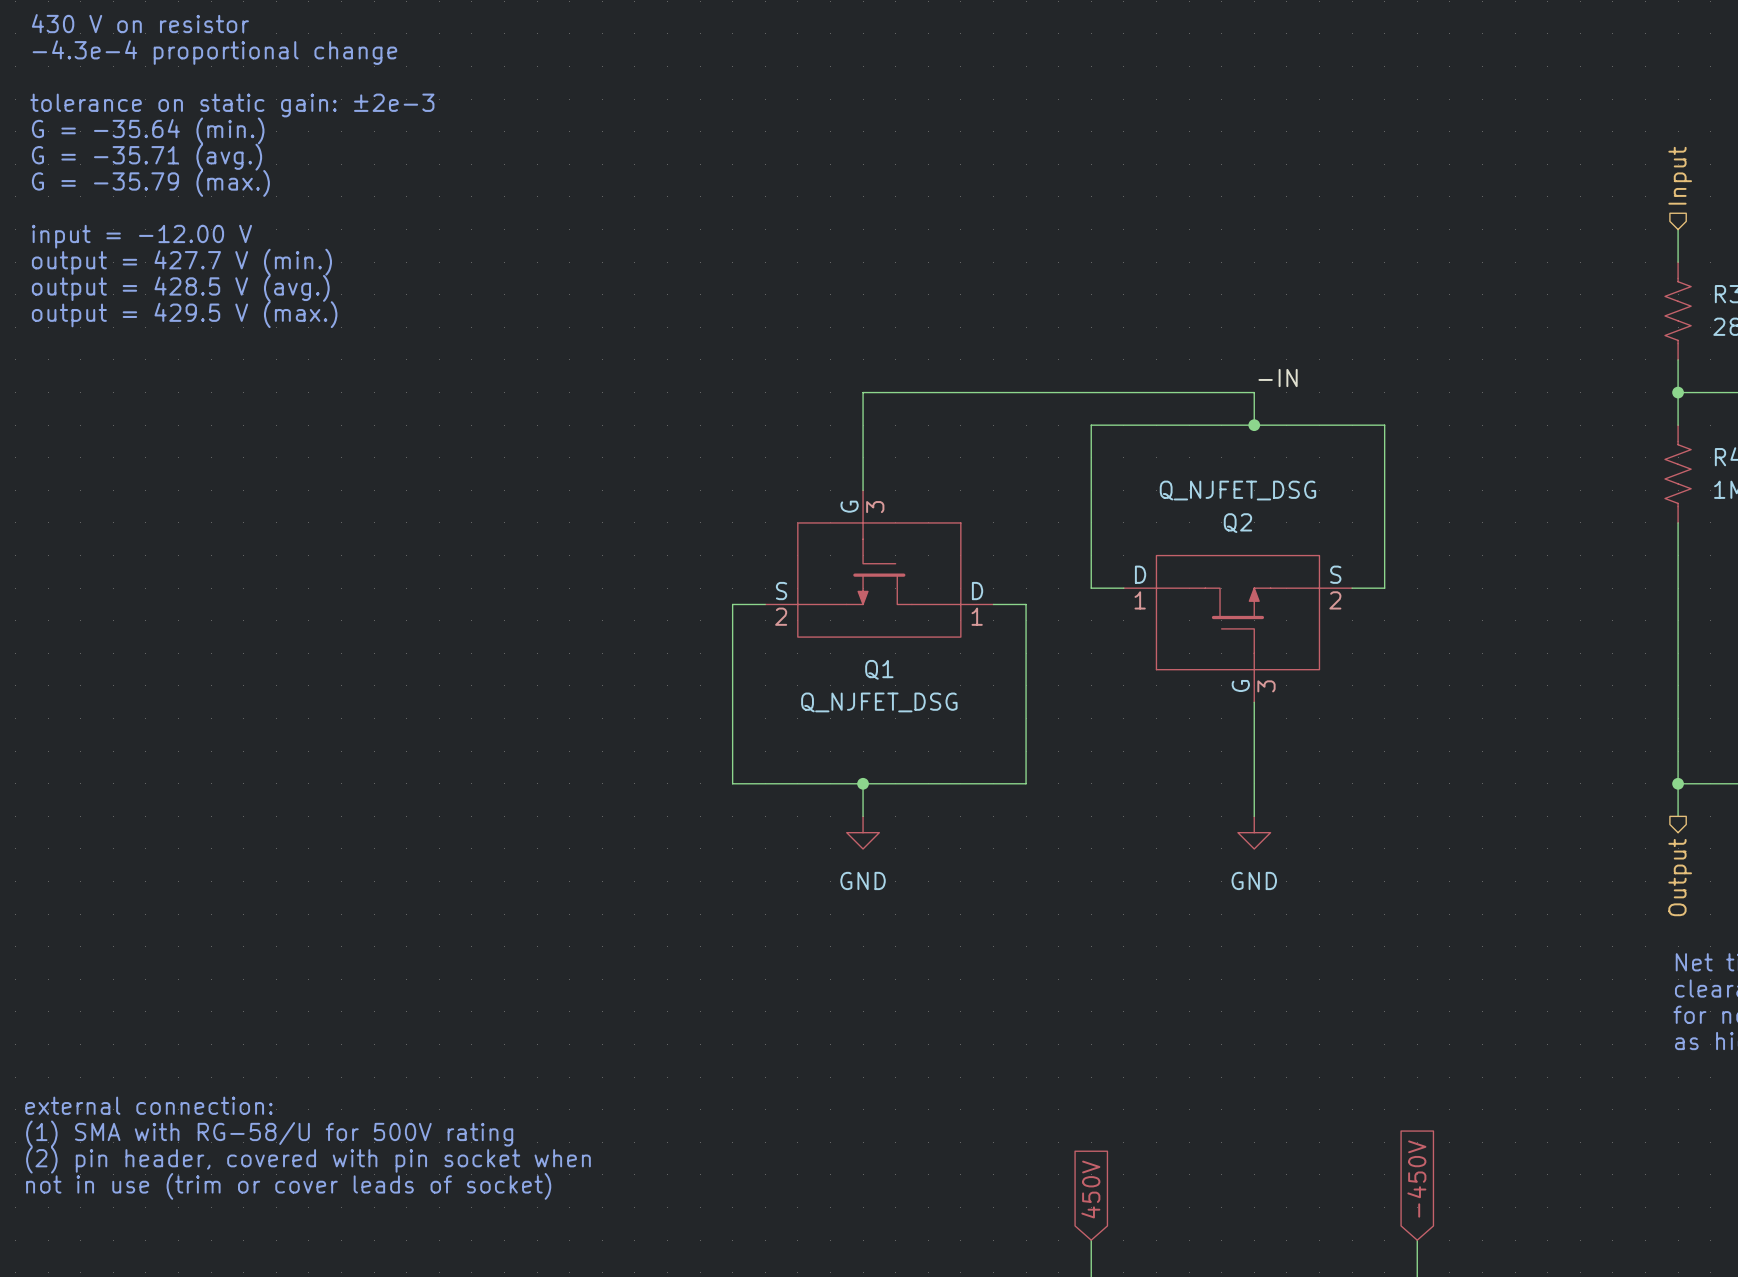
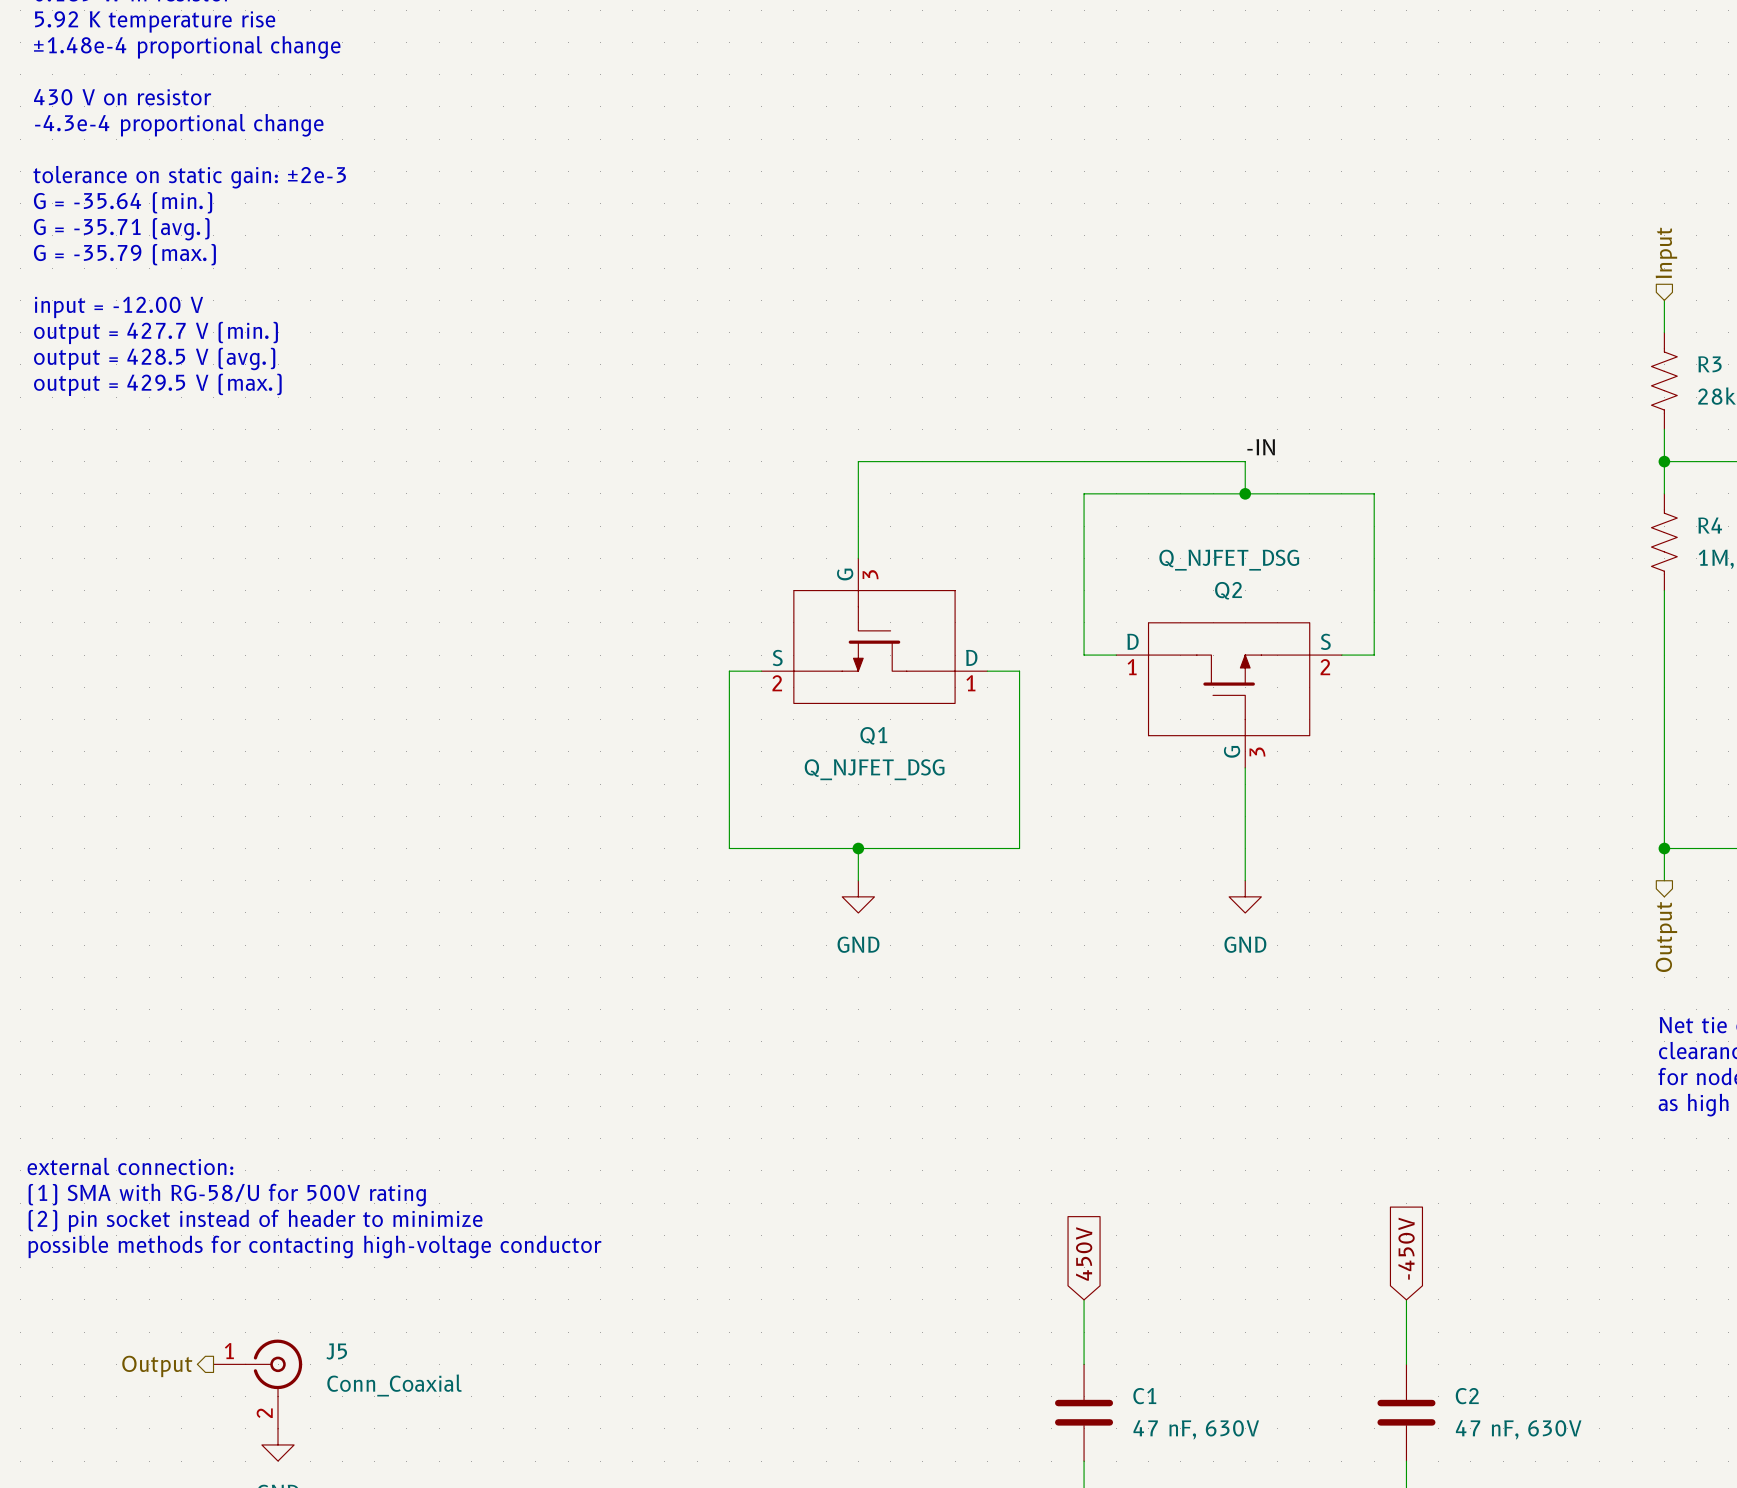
text: (2) pin header, covered with pin socket when (308, 1160) -> (2) pin socket instead of header to minimize (255, 1220)
text: not in use (trim or cover leads of socket) (288, 1186) -> possible methods for contacting high-voltage conductor (314, 1246)

